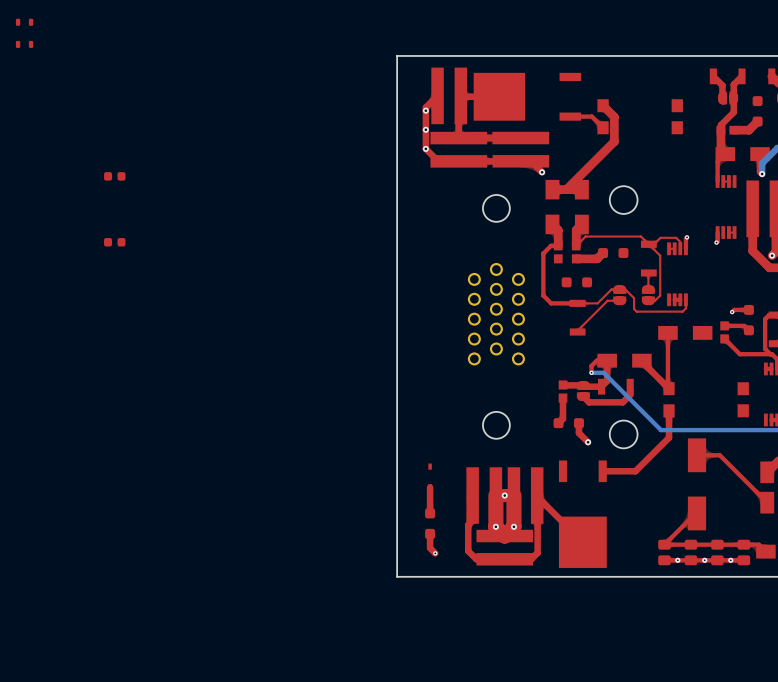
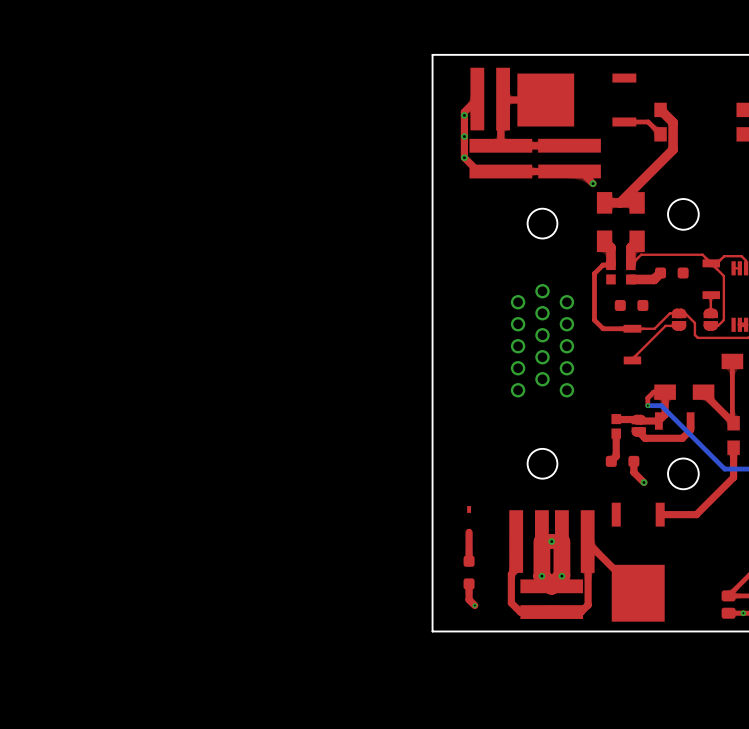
part: (24, 22) -> none
part: (24, 44) -> none
part: (114, 176) -> none
part: (114, 242) -> none

